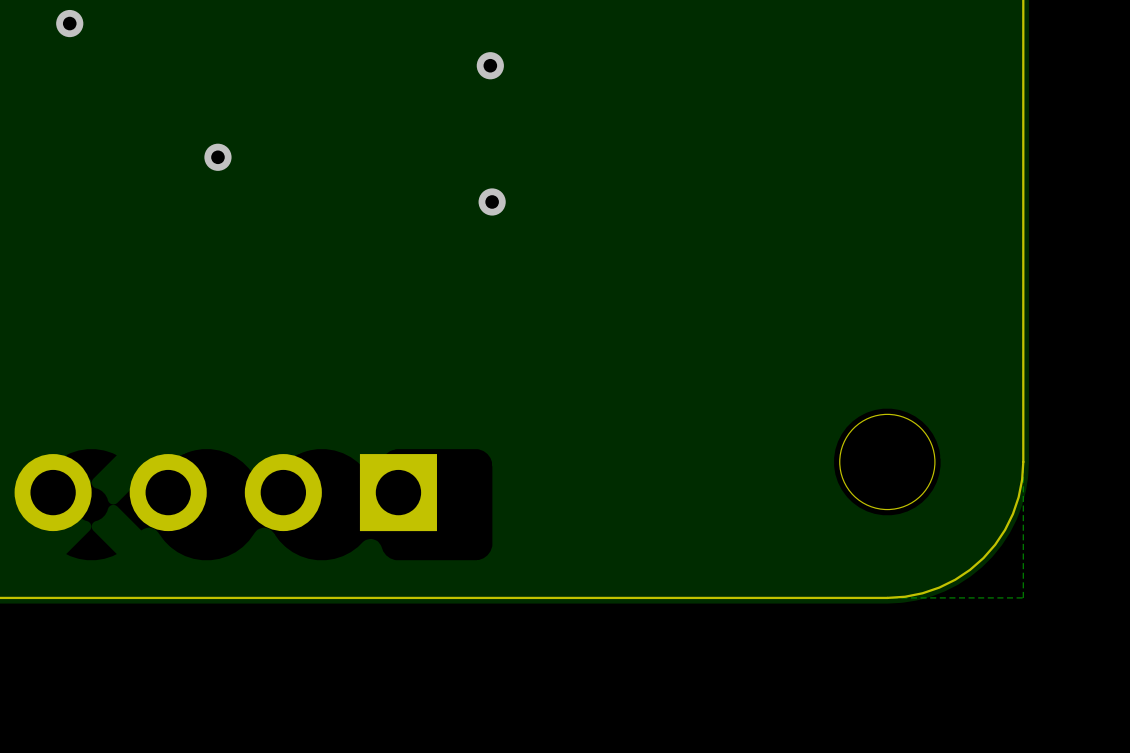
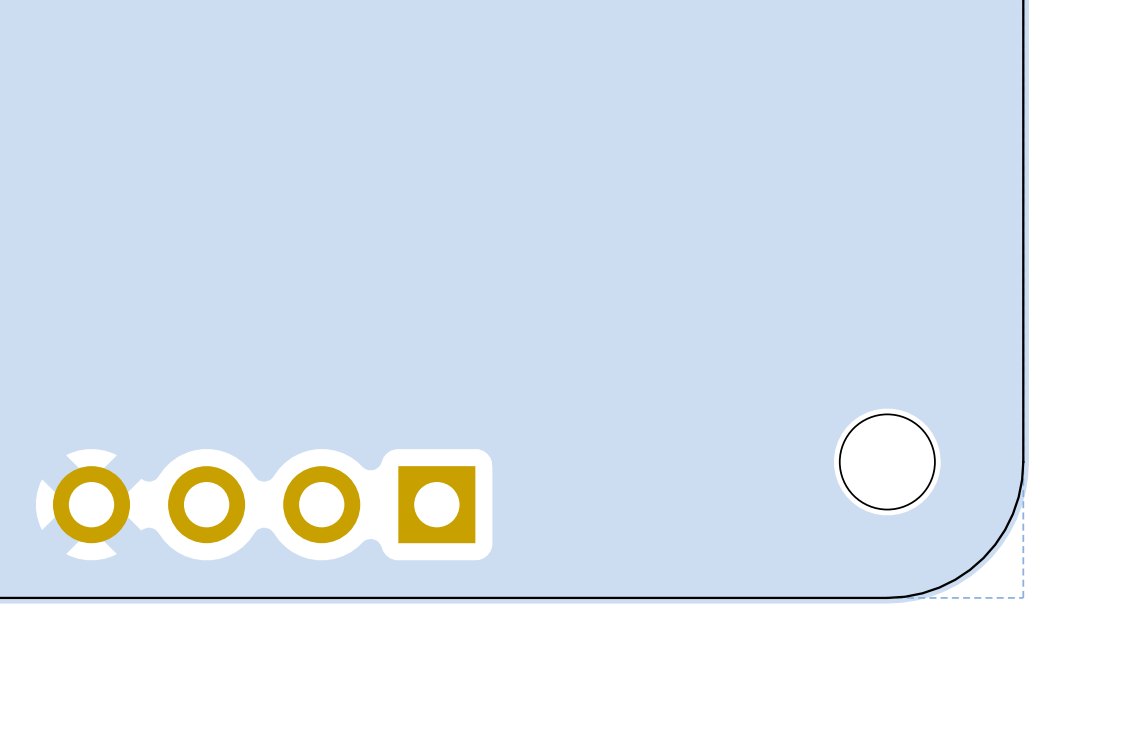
via: (69, 23) -> none
via: (490, 65) -> none
via: (217, 157) -> none
via: (492, 201) -> none
part position: (225, 492) -> (264, 504)

